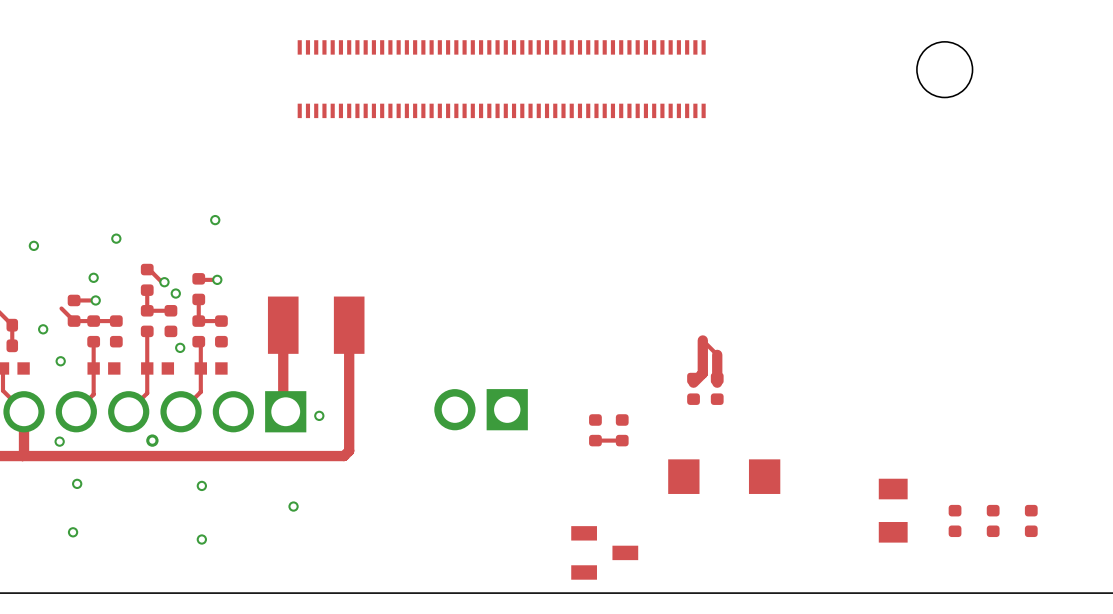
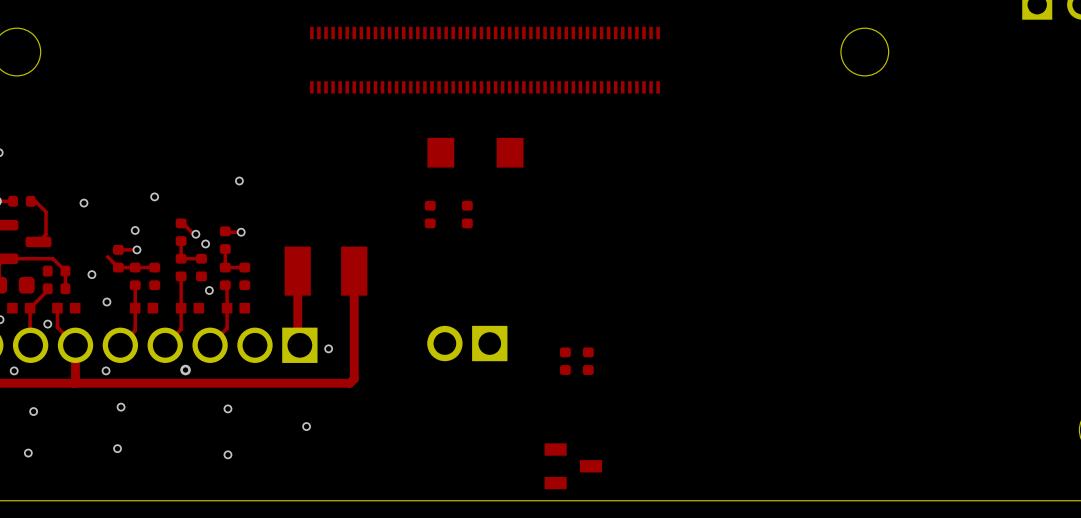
part: none -> (430, 214)
part: none -> (467, 214)
top track: (717, 382) (717, 354) (702, 340) (702, 373) (693, 382) -> none
part: (693, 388) -> none
part: (717, 388) -> none
top track: (622, 440) (595, 440) -> none
part position: (724, 476) -> (475, 152)
part: (893, 510) -> none
part: (955, 520) -> none
part: (993, 520) -> none
part: (1031, 520) -> none

